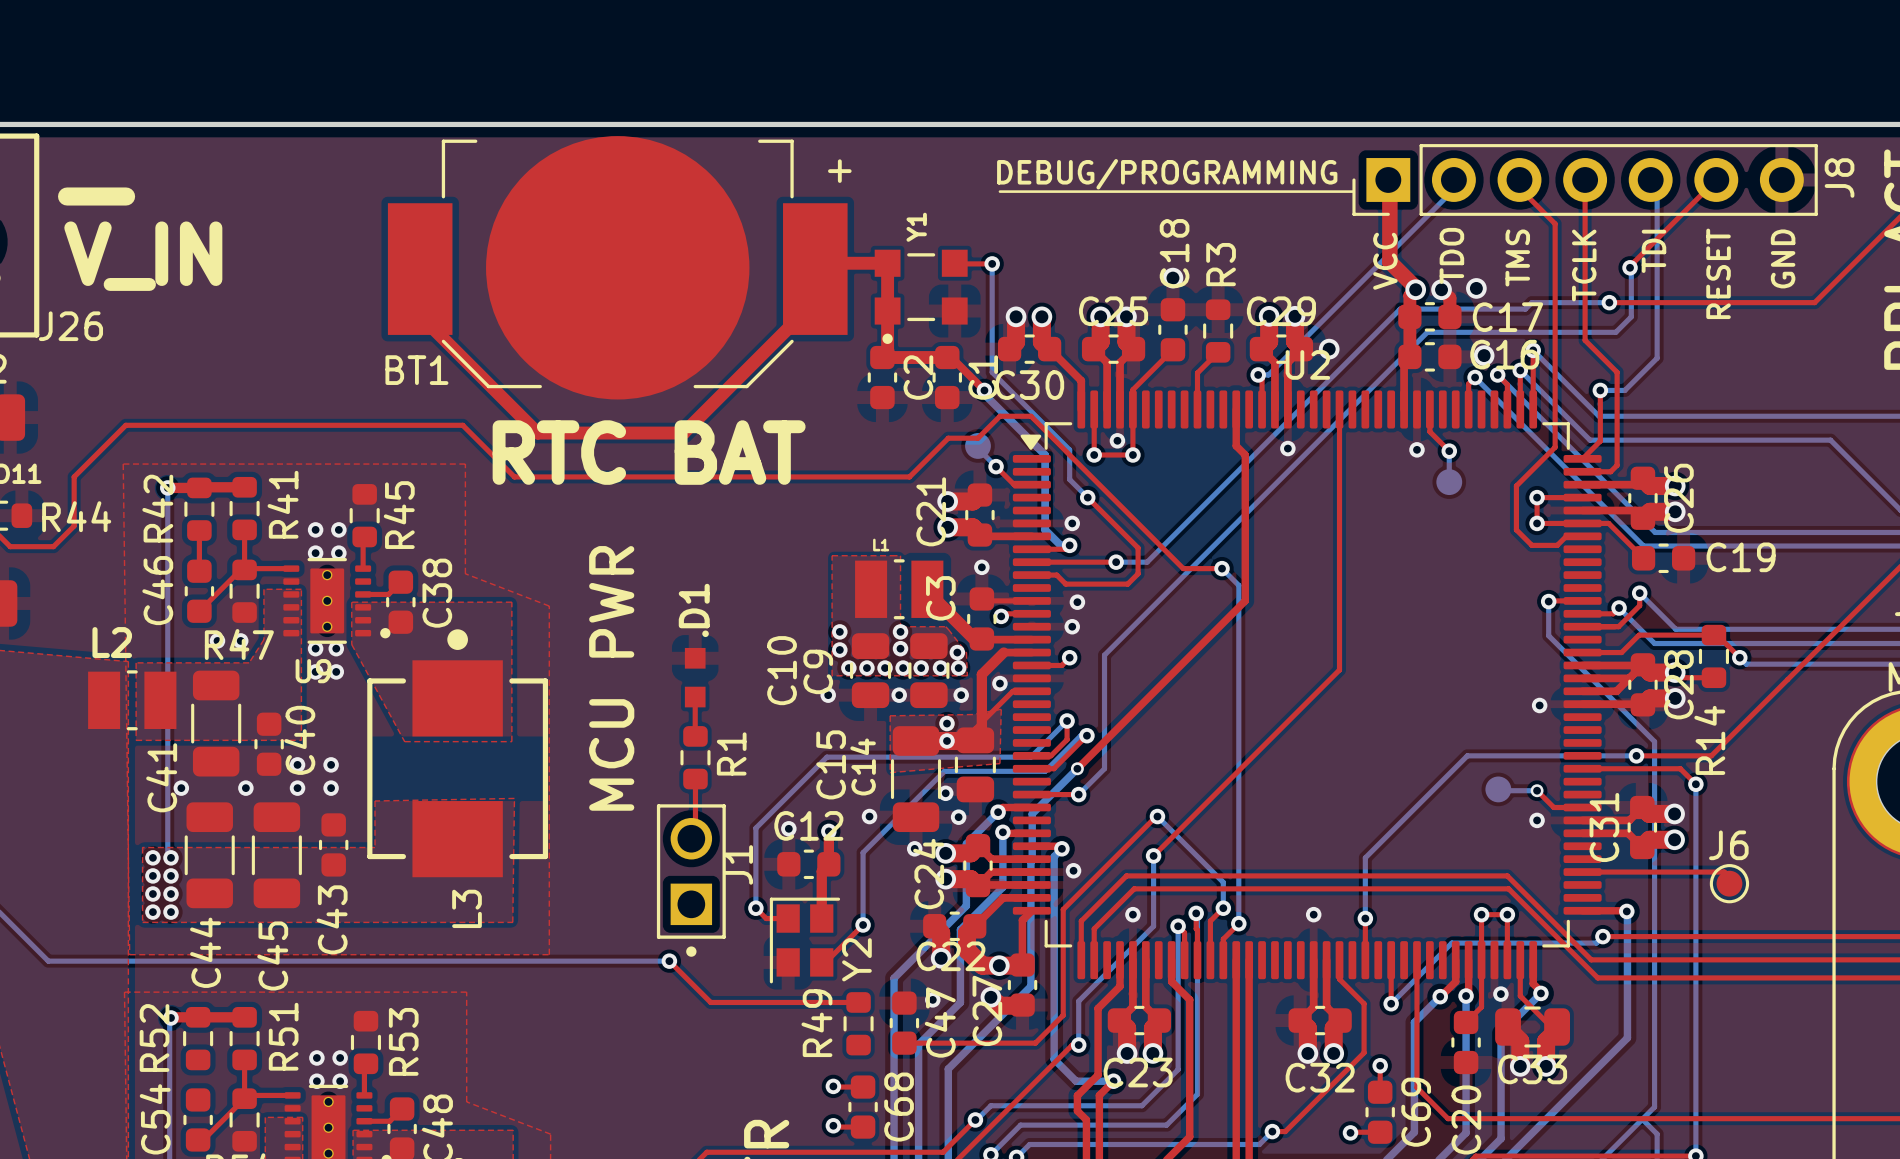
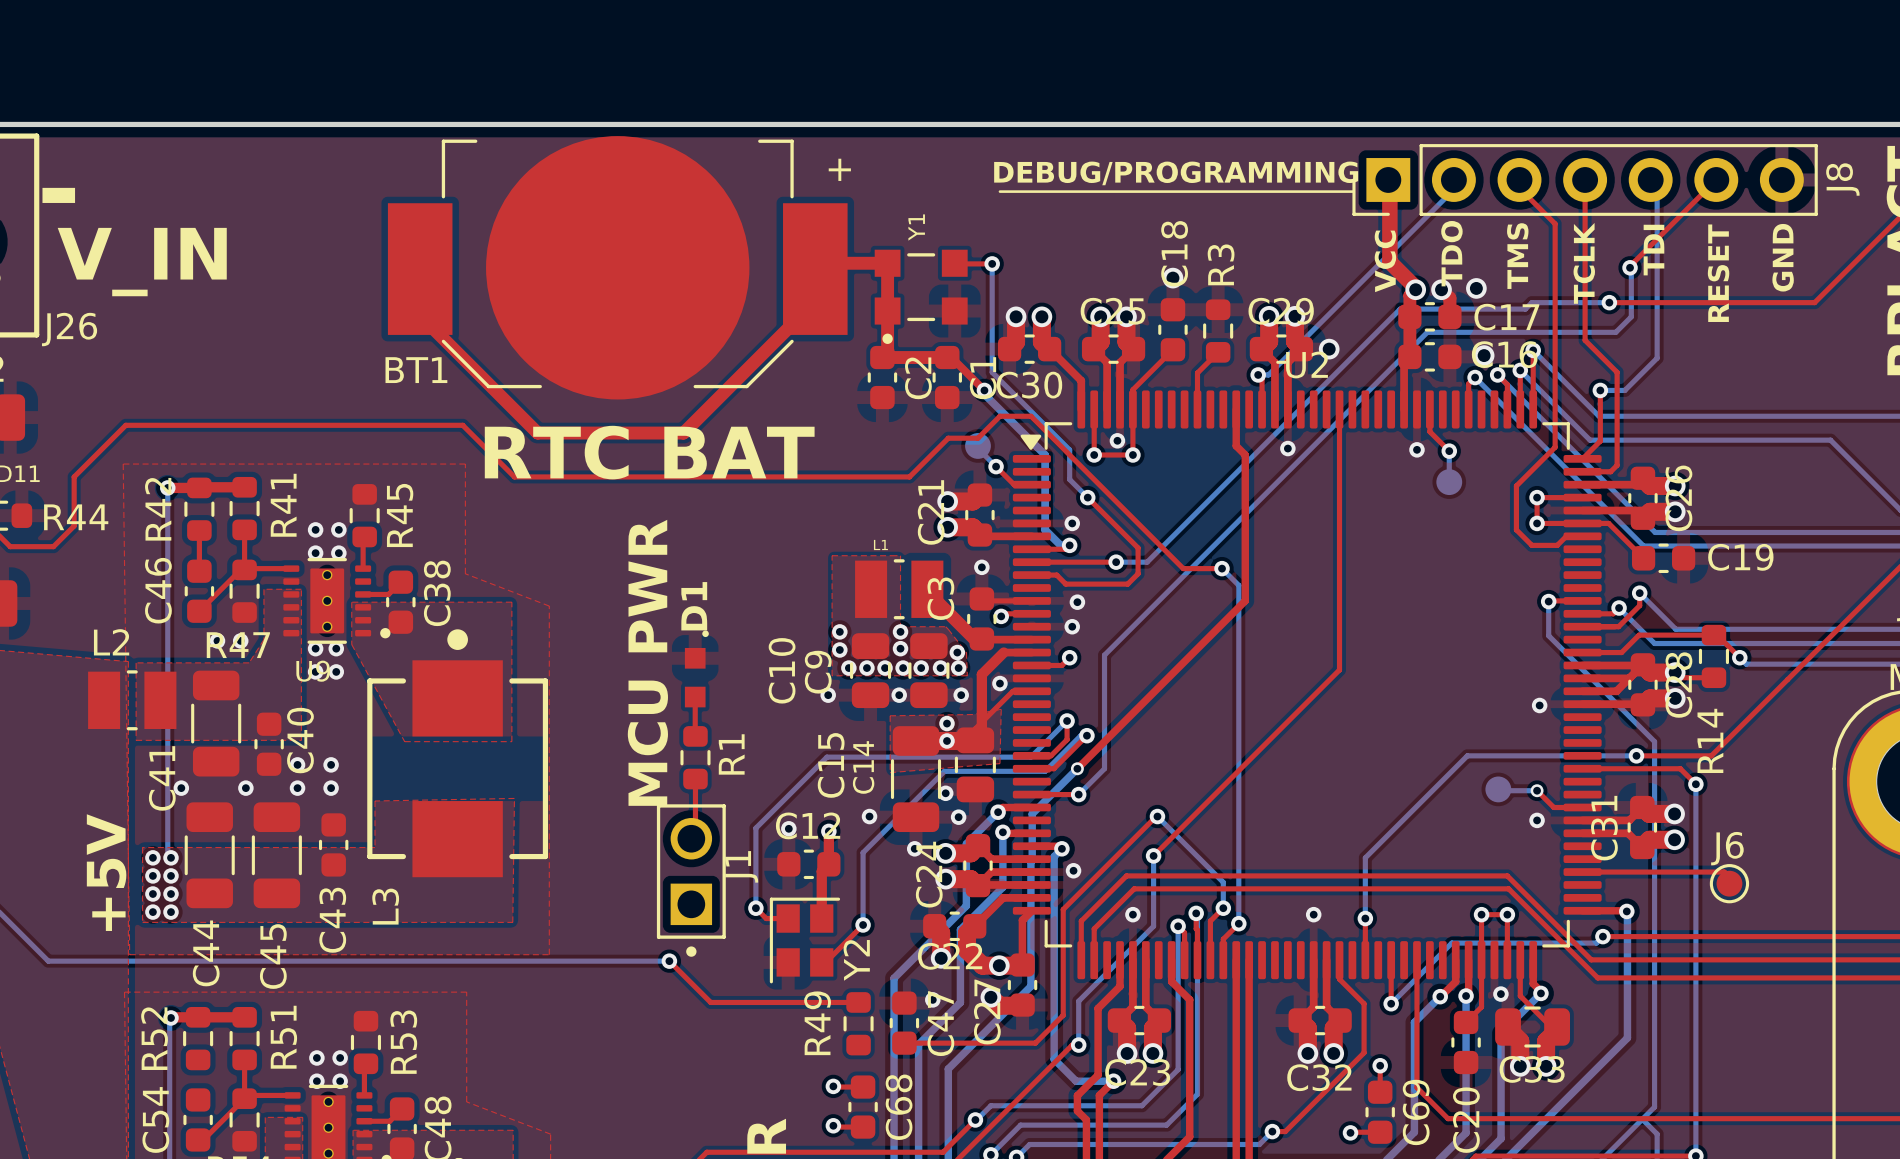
text position: MCU PWR (611, 678) -> MCU PWR (647, 662)
text: none -> +5V (106, 872)
L3 name position: L3 (467, 908) -> L3 (385, 906)

